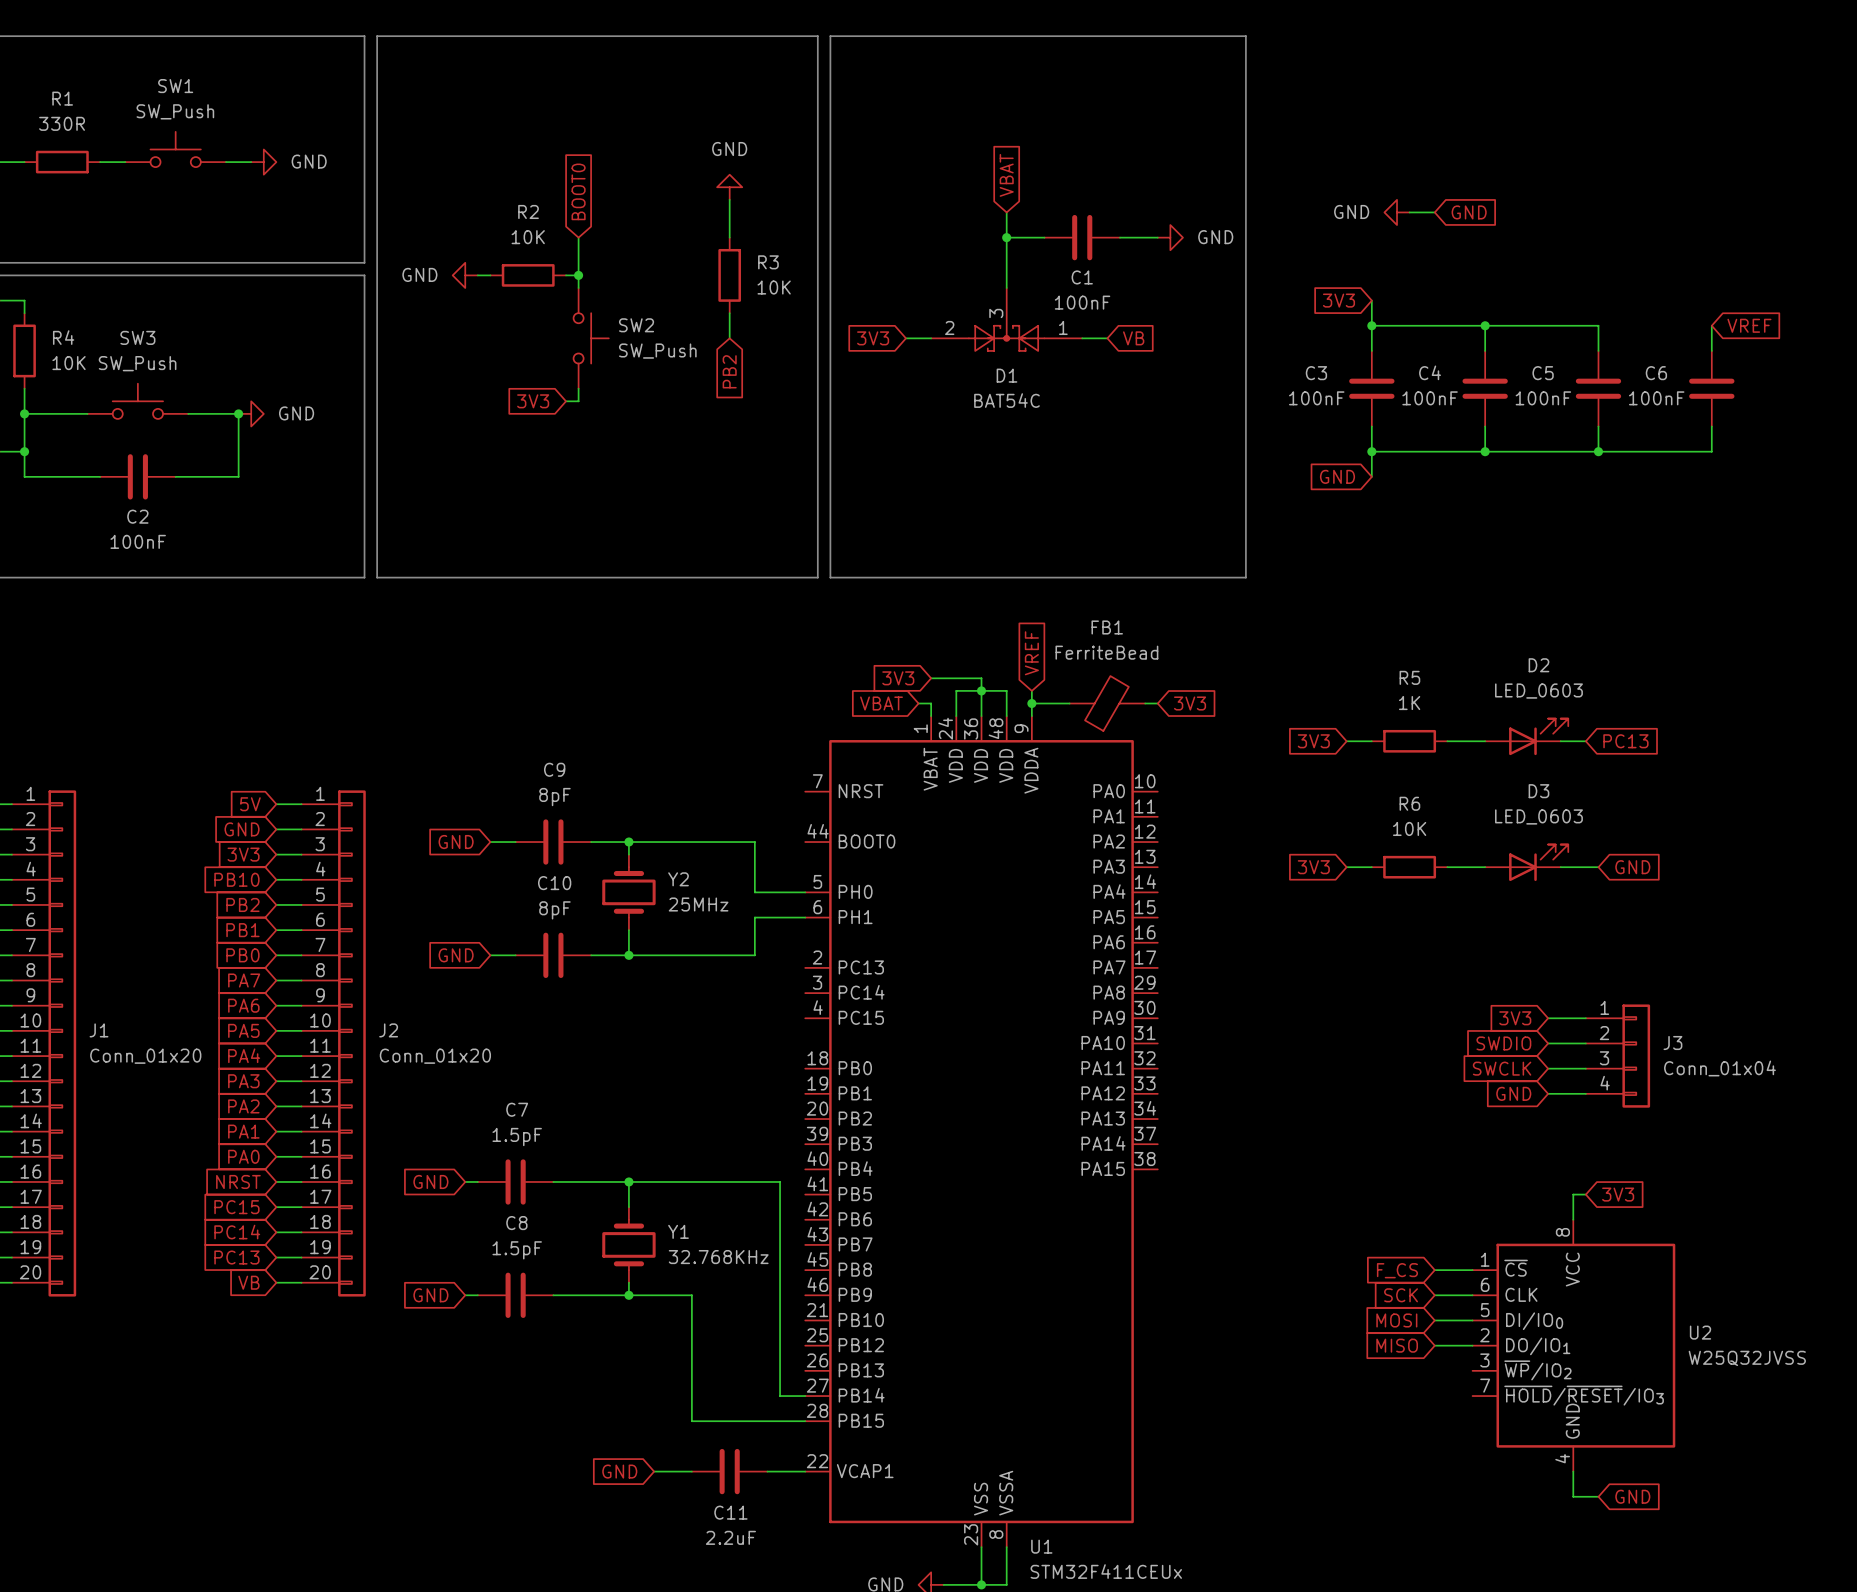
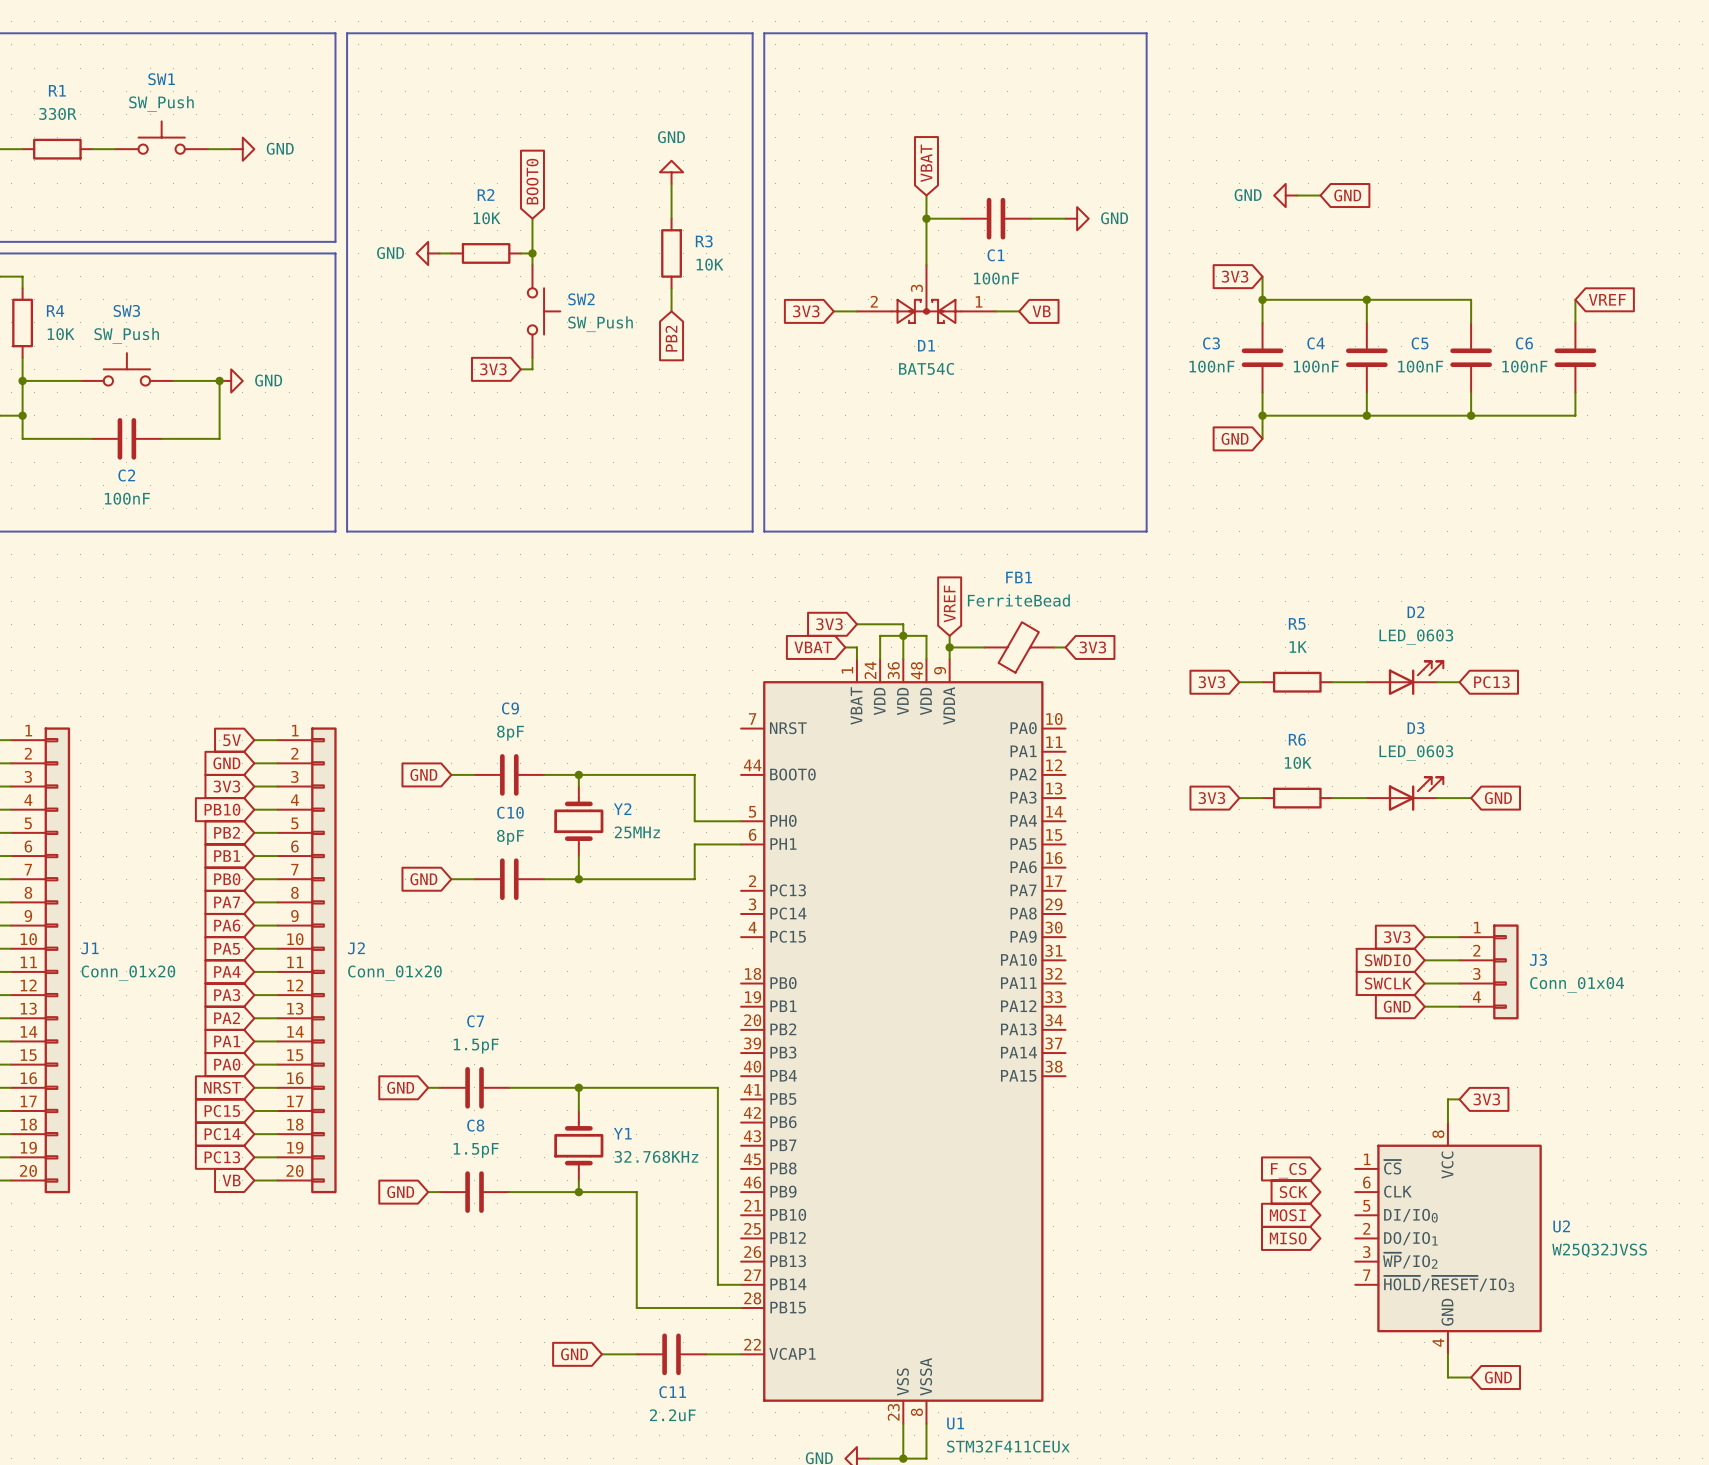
wire: (1434, 1270) (1472, 1270) -> none
wire: (1434, 1295) (1472, 1295) -> none
wire: (1434, 1320) (1472, 1320) -> none
wire: (1434, 1345) (1472, 1345) -> none

